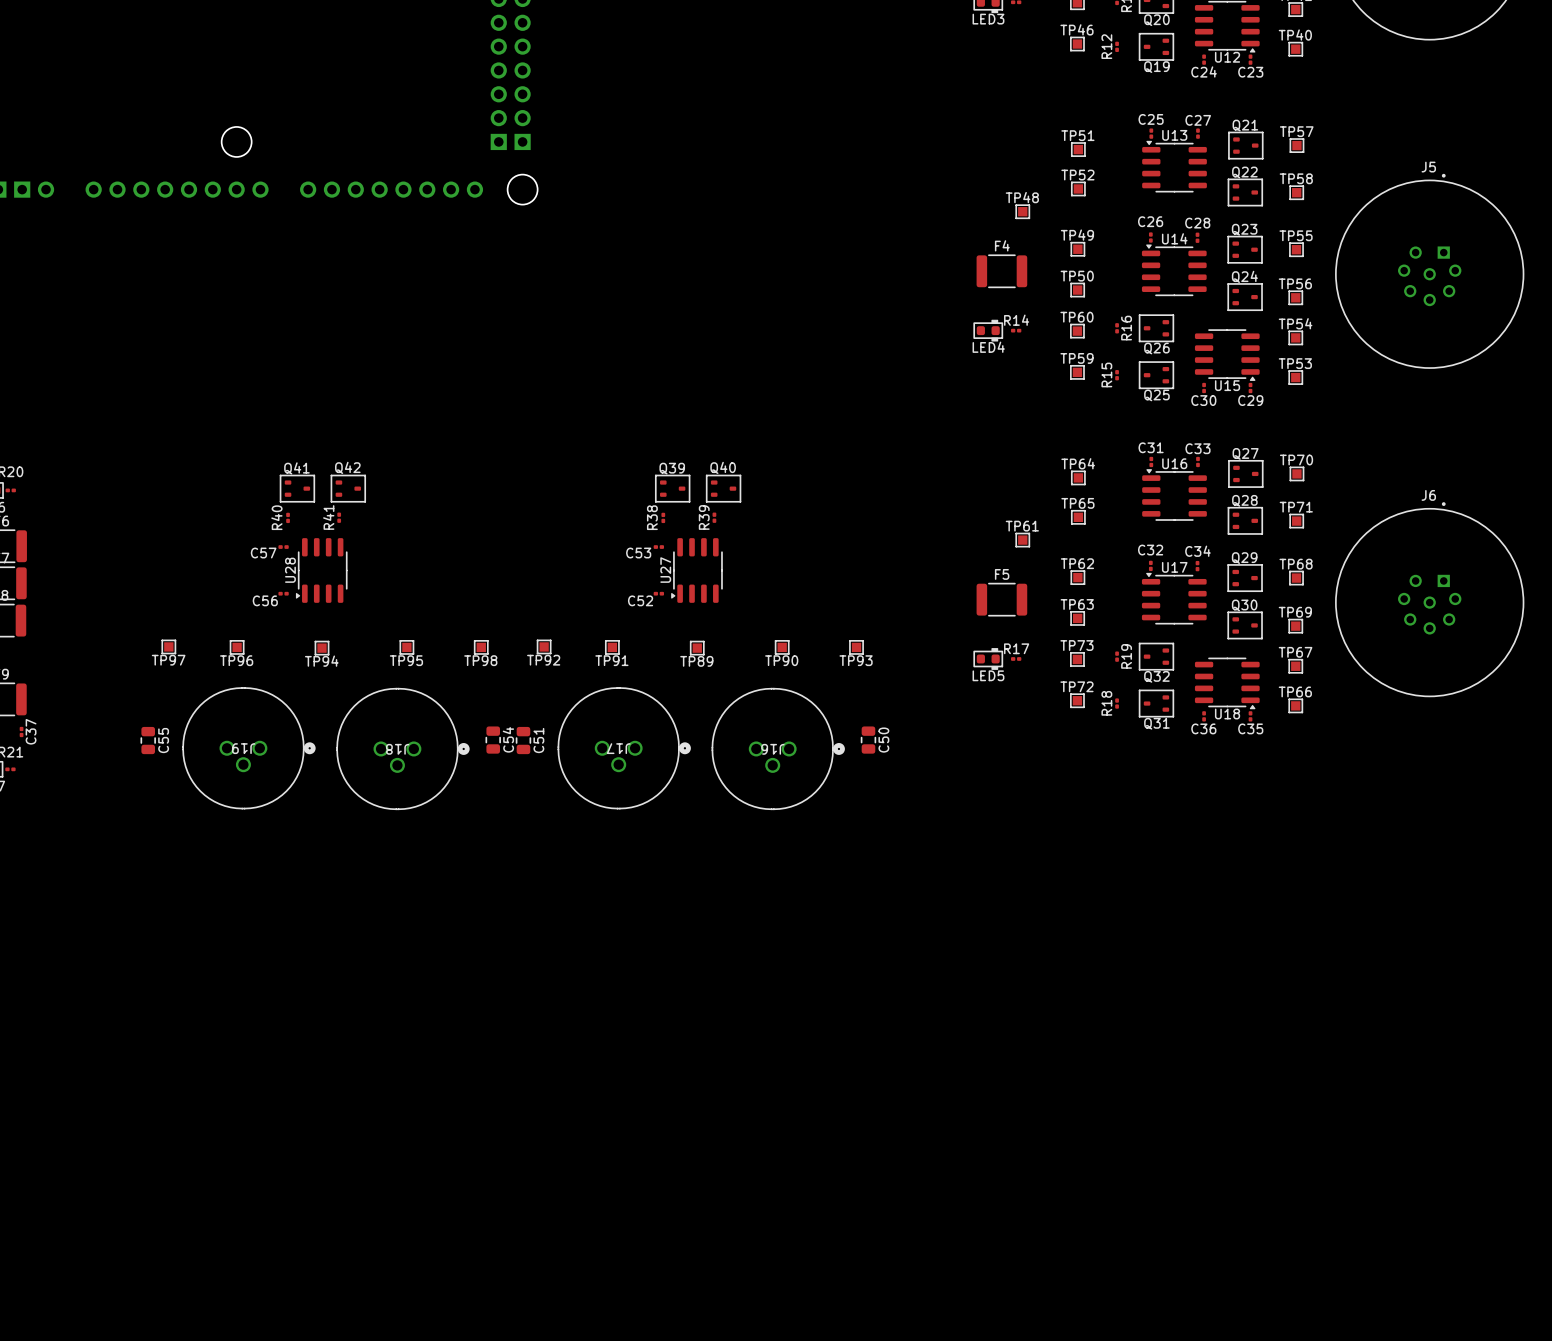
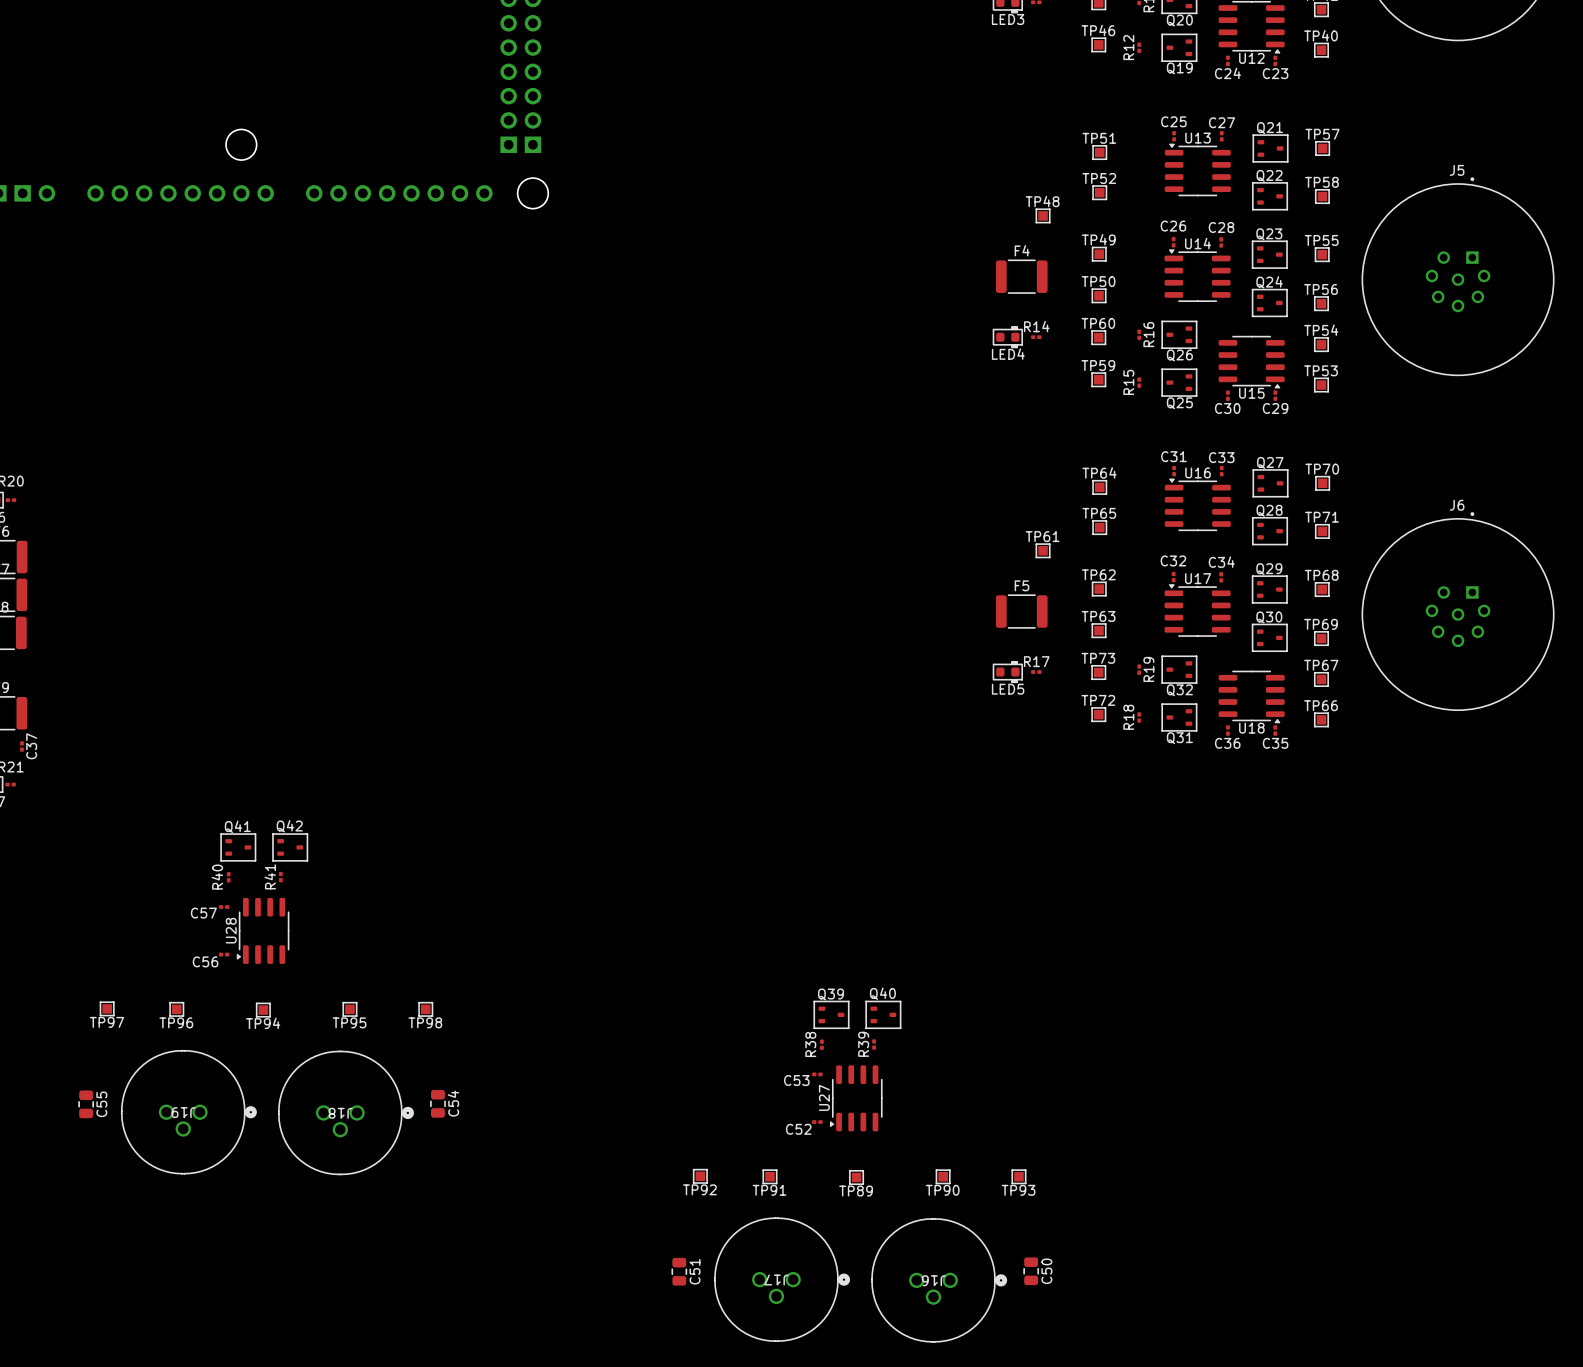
Q41 position: (297, 488) -> (238, 847)
Q42 position: (348, 488) -> (290, 847)
Q39 position: (672, 488) -> (831, 1014)
Q40 position: (723, 488) -> (883, 1014)
R40 position: (288, 517) -> (228, 877)
R41 position: (339, 517) -> (280, 877)
R38 position: (663, 517) -> (821, 1044)
R39 position: (714, 517) -> (874, 1044)
C57 position: (283, 547) -> (224, 907)
C53 position: (658, 547) -> (817, 1074)
U28 position: (321, 570) -> (262, 930)
U27 position: (696, 570) -> (856, 1098)
C56 position: (283, 593) -> (224, 954)
C52 position: (658, 593) -> (817, 1122)
TP97 position: (168, 646) -> (107, 1008)
TP92 position: (544, 646) -> (700, 1176)
TP96 position: (237, 647) -> (176, 1009)
TP95 position: (406, 647) -> (349, 1009)
TP98 position: (481, 647) -> (425, 1009)
TP91 position: (612, 647) -> (769, 1176)
TP90 position: (782, 647) -> (943, 1176)
TP93 position: (856, 647) -> (1018, 1176)
TP94 position: (322, 648) -> (263, 1010)
TP89 position: (697, 648) -> (856, 1177)
C55 position: (148, 740) -> (86, 1104)
C54 position: (493, 740) -> (437, 1103)
C51 position: (523, 740) -> (679, 1271)
C50 position: (868, 740) -> (1031, 1271)
J19 position: (249, 748) -> (188, 1112)
J18 position: (403, 748) -> (346, 1112)
J17 position: (624, 748) -> (782, 1279)
J16 position: (778, 748) -> (939, 1280)

